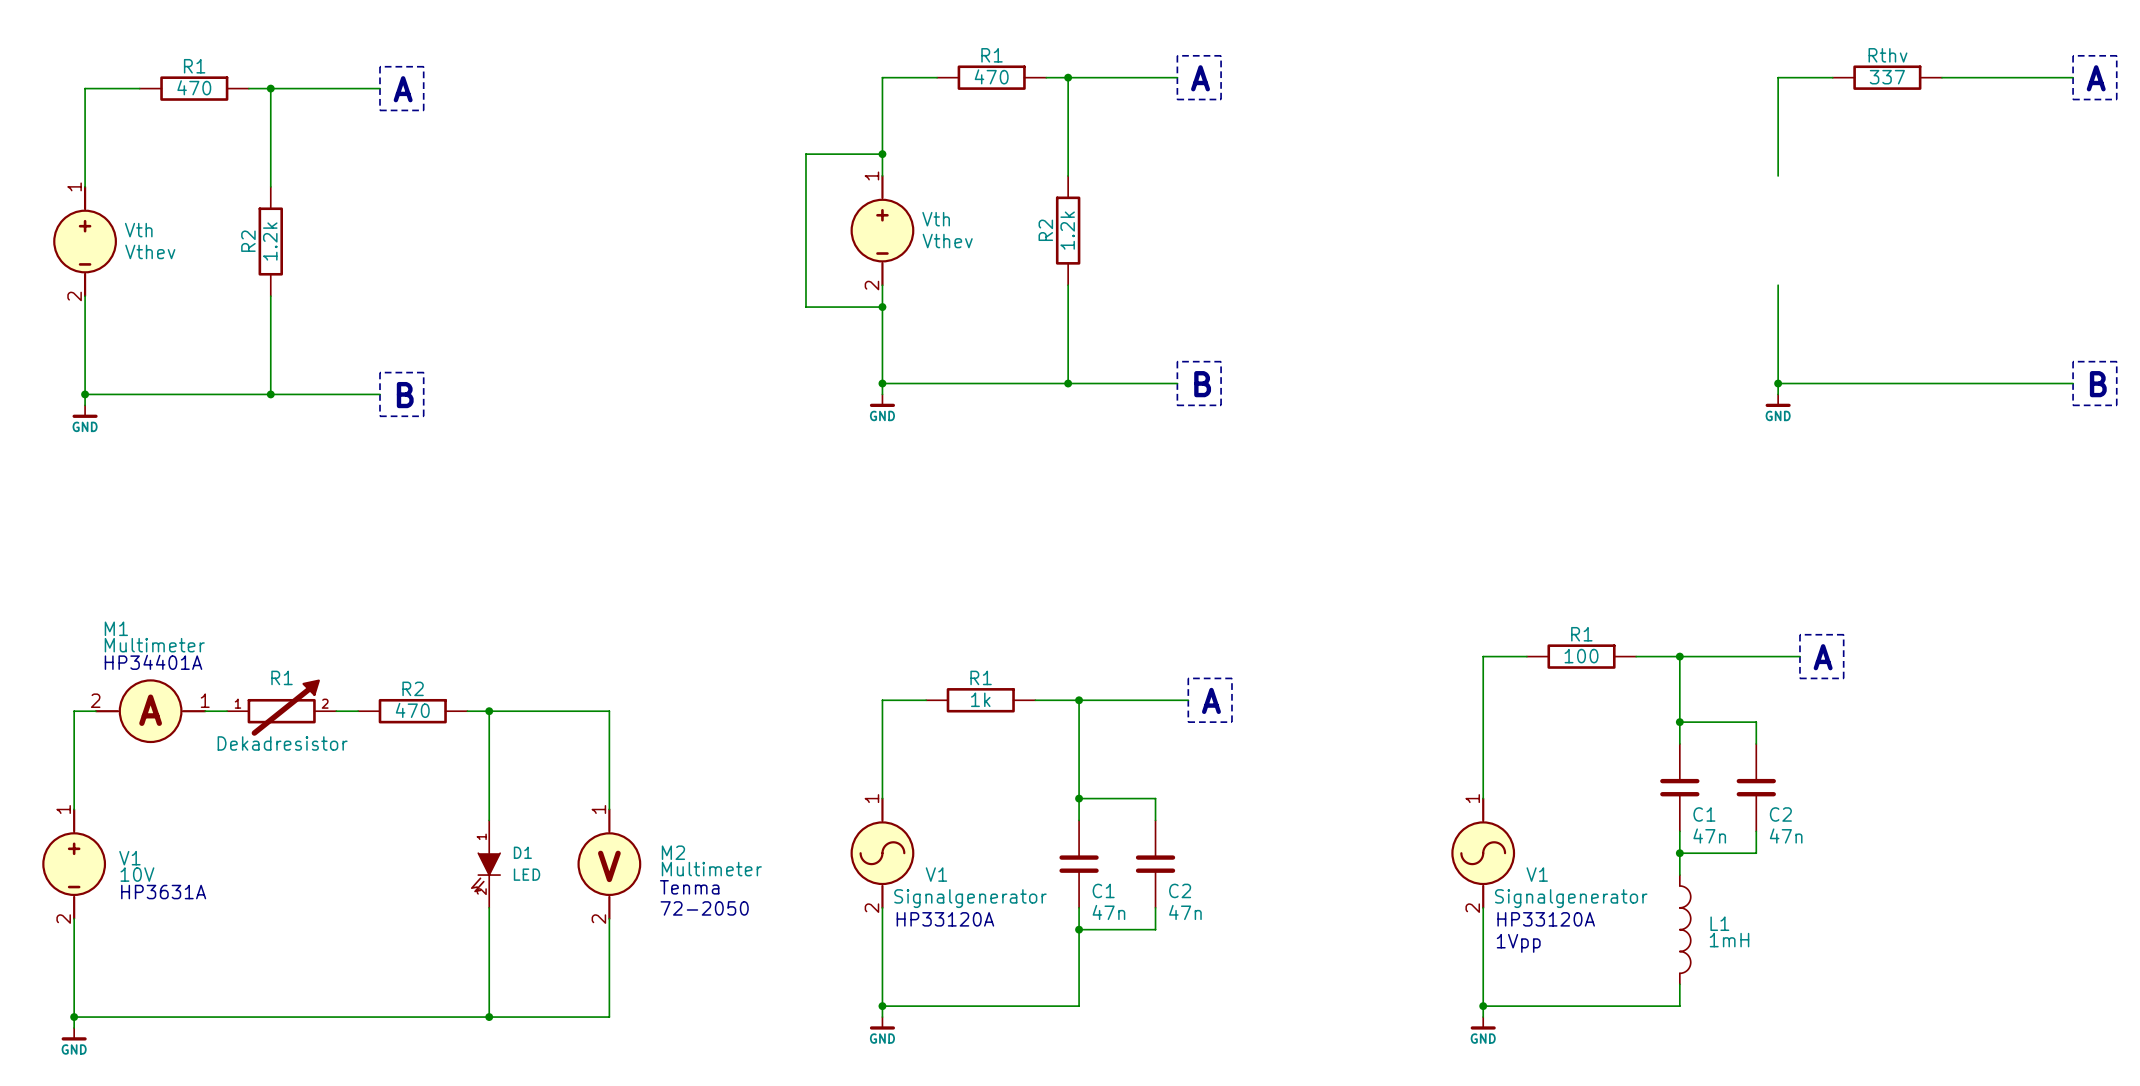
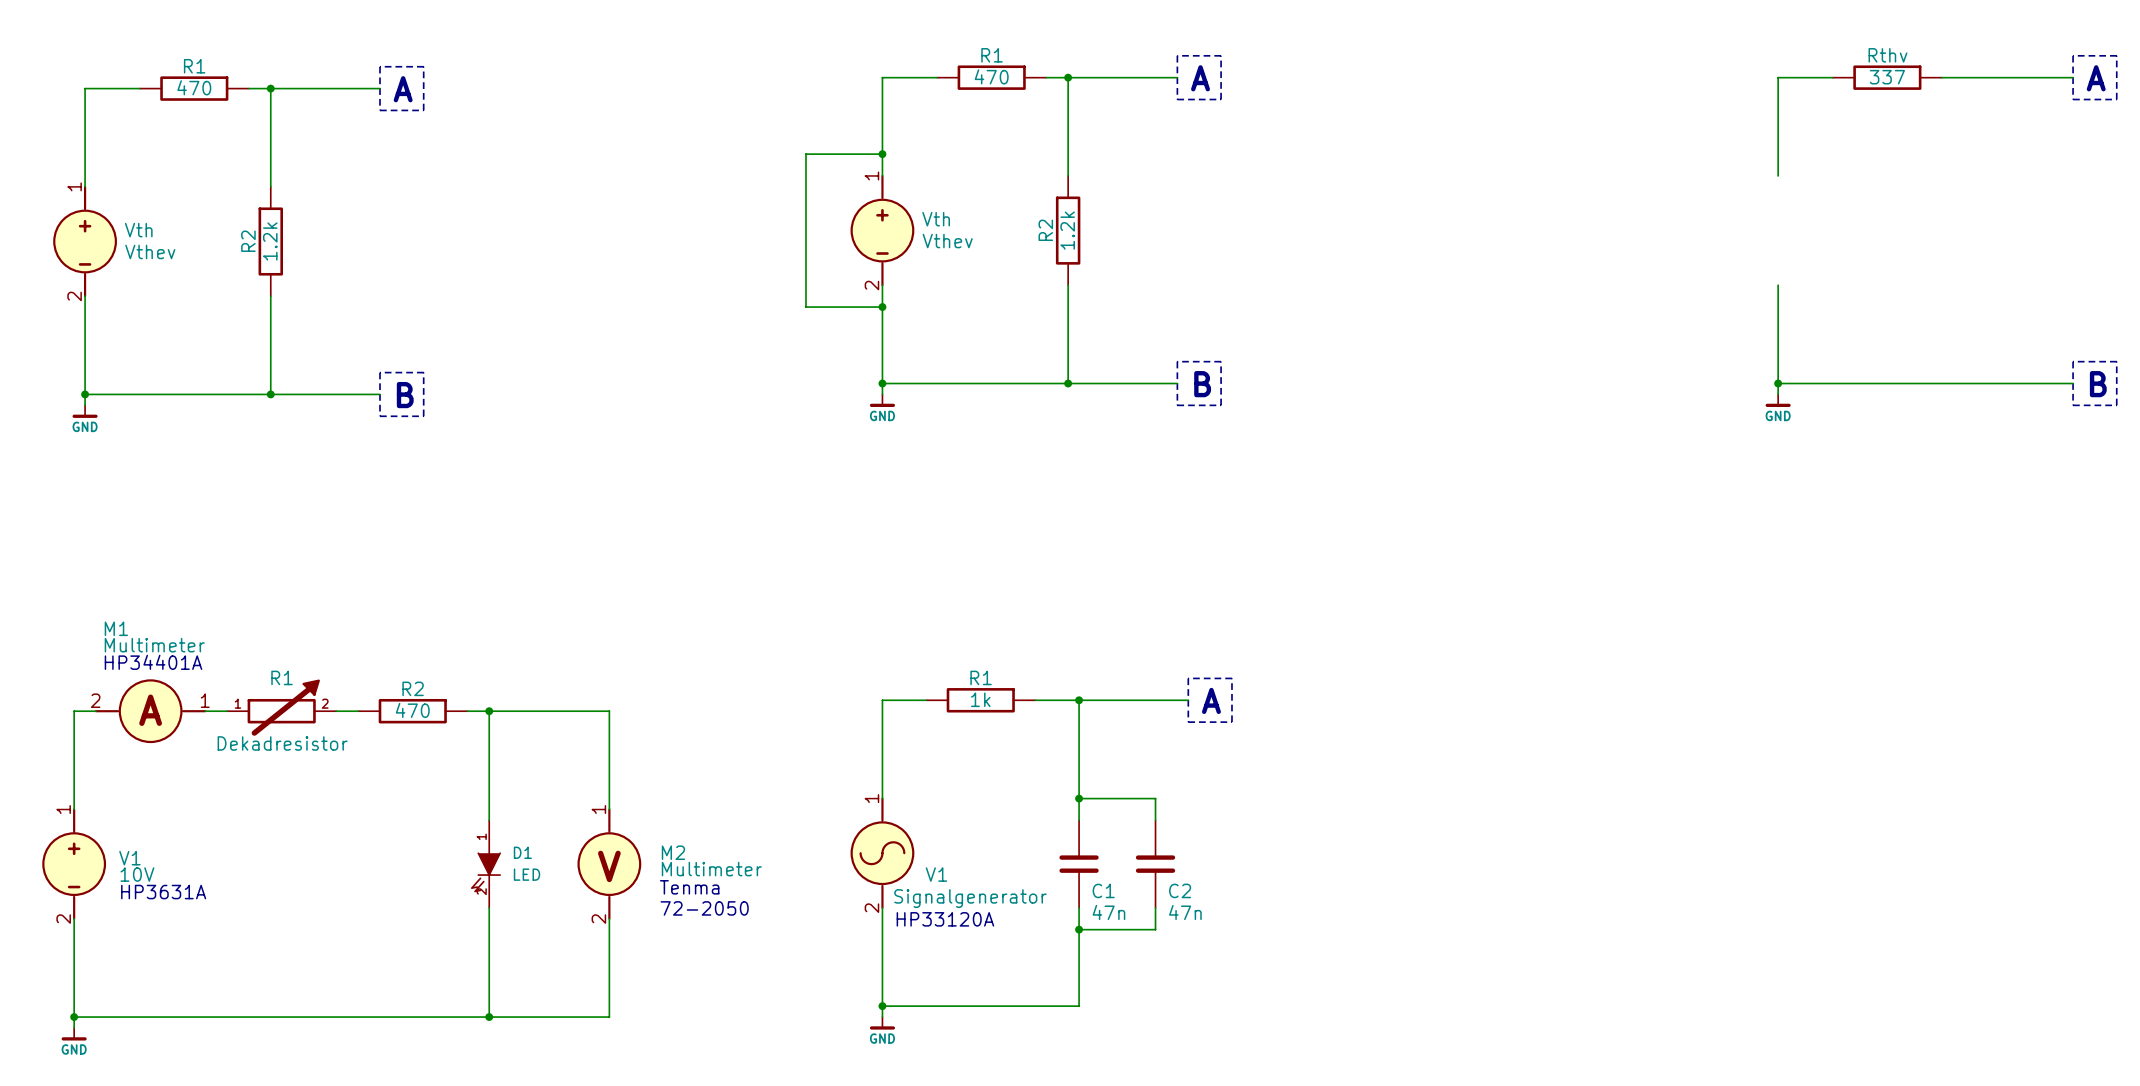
line: (1799, 634) (1799, 678) (1843, 678) (1843, 634) (1799, 634) -> none
wire: (1526, 656) (1483, 656) (1483, 798) -> none
R1: 100 (1581, 656) -> none
wire: (1636, 656) (1799, 656) -> none
wire: (1679, 656) (1679, 743) -> none
junction: (1679, 656) -> none
text: A (1823, 657) -> none
wire: (1679, 722) (1756, 722) (1756, 743) -> none
junction: (1679, 722) -> none
C1: 47n (1679, 787) -> none
C2: 47n (1756, 787) -> none
wire: (1679, 831) (1679, 875) -> none
wire: (1756, 831) (1756, 853) (1679, 853) -> none
V1: Signalgenerator (1483, 853) -> none
junction: (1679, 853) -> none
wire: (1483, 907) (1483, 1017) -> none
text: HP33120A (1546, 919) -> none
L1: 1mH (1685, 929) -> none
text: 1Vpp (1518, 943) -> none
wire: (1679, 984) (1679, 1006) (1483, 1006) -> none
junction: (1483, 1006) -> none
power symbol: GND (1483, 1023) -> none

